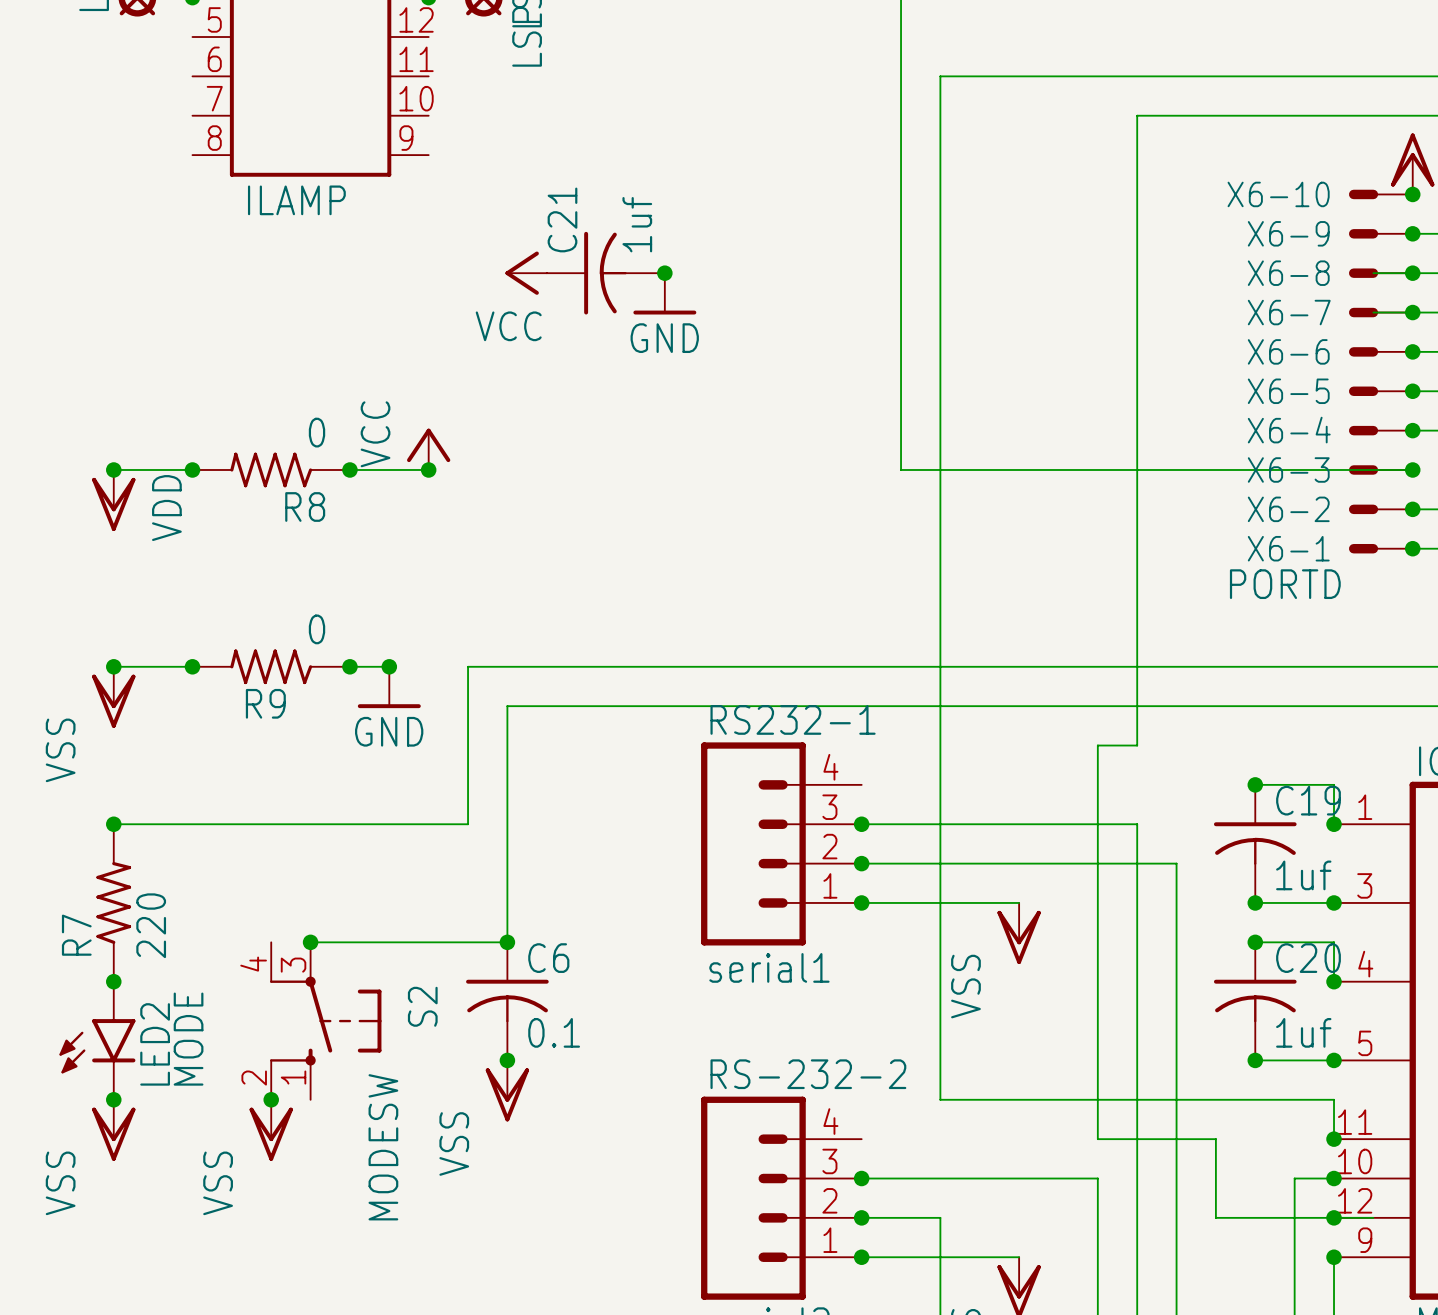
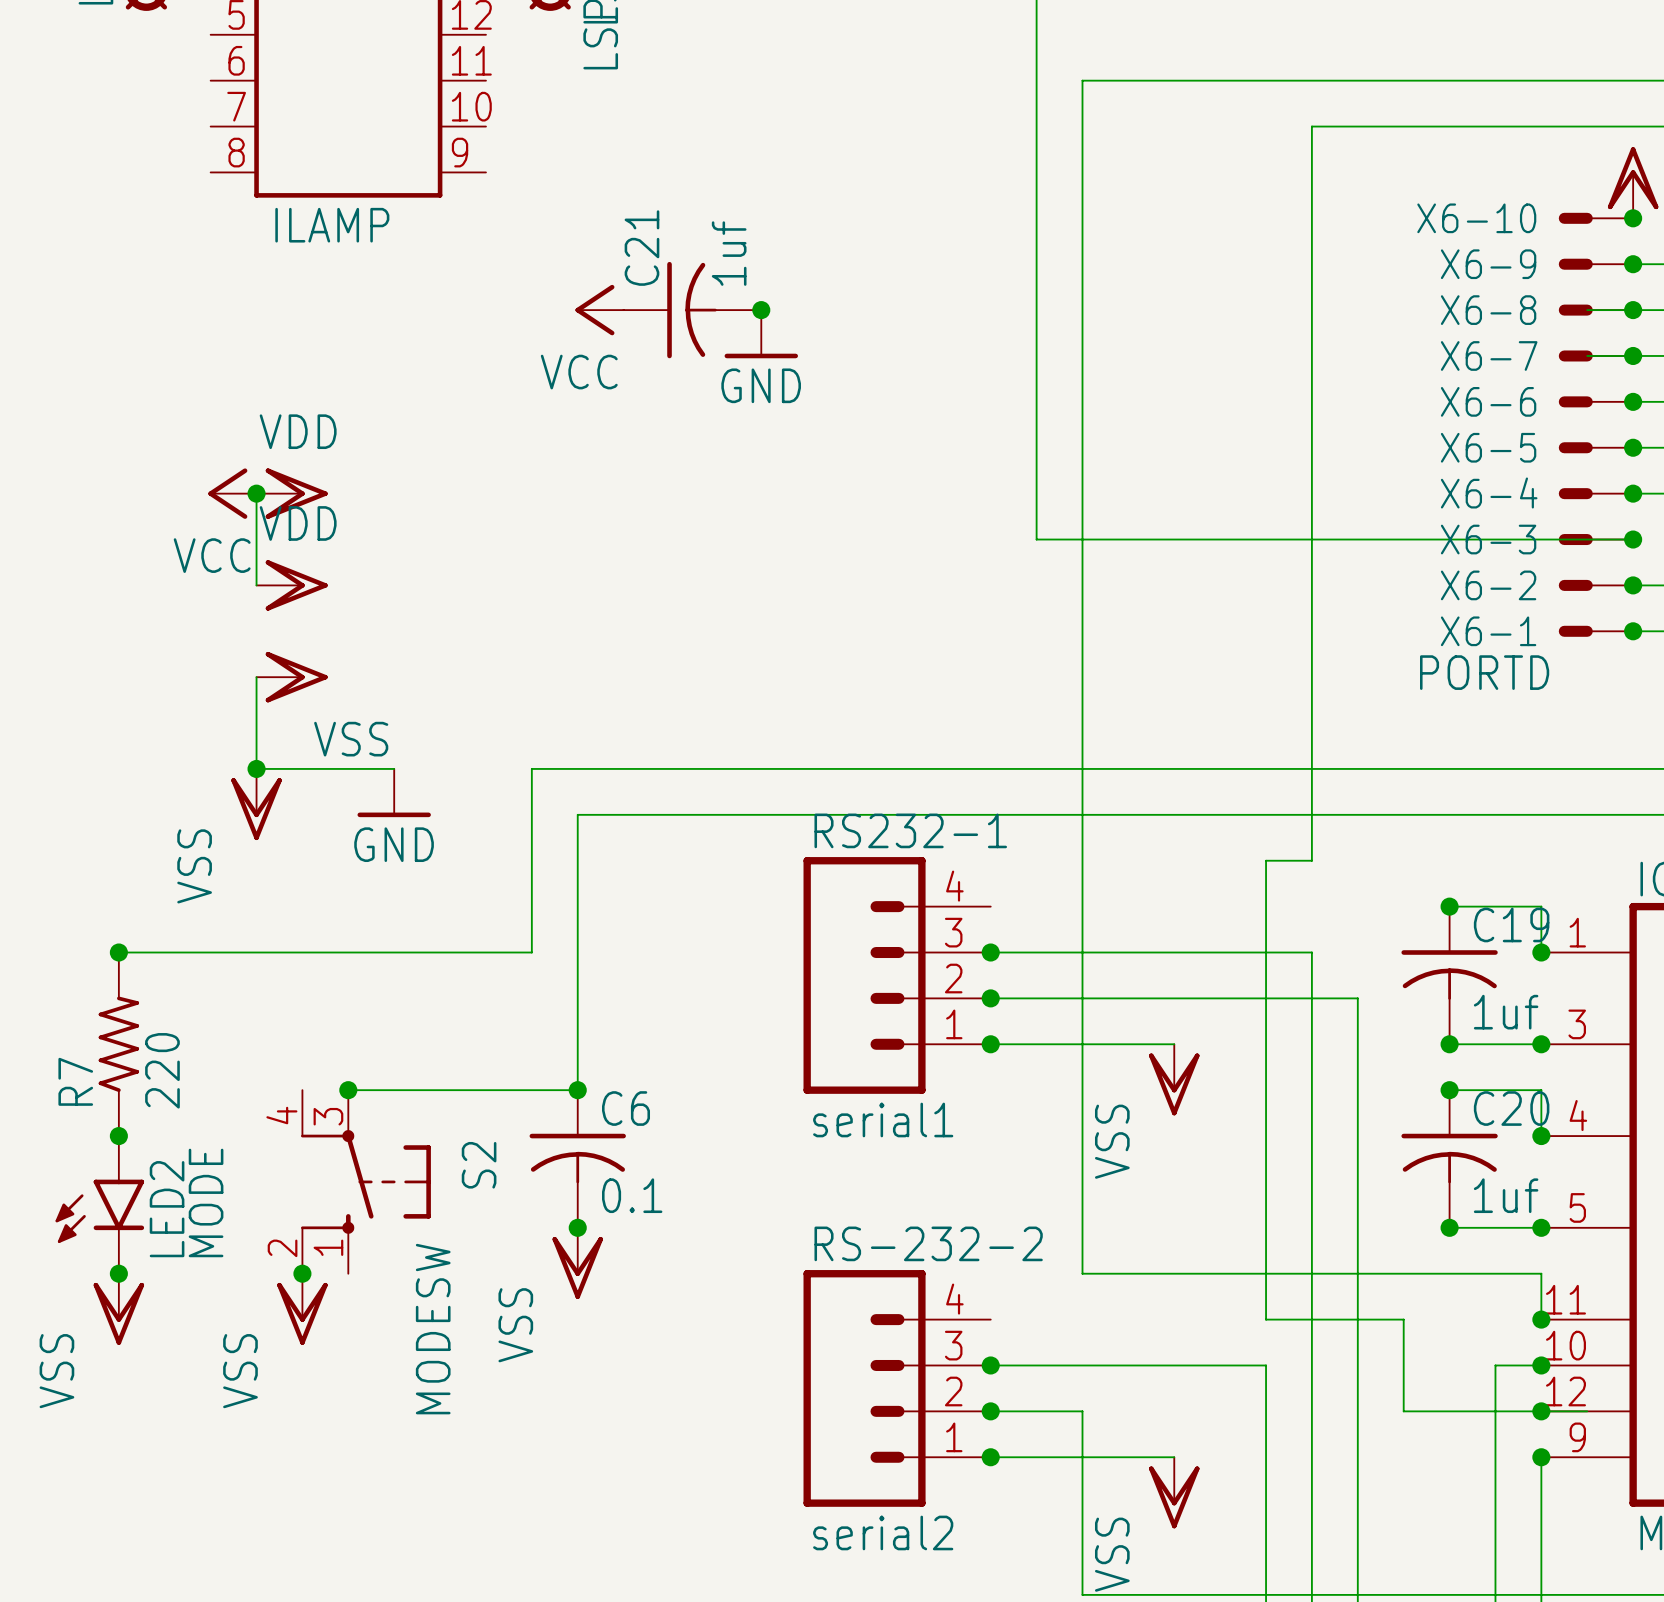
wire: none -> (256, 493) (256, 585)
power symbol: none -> VDD (292, 493)
power symbol rotation: 0° (428, 445) -> 90° counterclockwise (227, 493)
power symbol position: VCC (428, 449) -> VCC (232, 493)
wire: (113, 469) (192, 469) -> none
junction: (113, 469) -> none
junction position: (192, 469) -> (256, 493)
R8: 0 (271, 469) -> none
wire: (349, 469) (428, 469) -> none
junction: (349, 469) -> none
junction: (428, 469) -> none
power symbol: VDD (113, 500) -> none
power symbol: none -> VDD (292, 585)
power symbol: none -> VSS (292, 677)
wire: (113, 666) (192, 666) -> none
junction: (113, 666) -> none
junction position: (192, 666) -> (256, 768)
R9: 0 (271, 666) -> none
wire: (349, 666) (389, 666) -> (394, 768) (256, 768) (256, 677)
junction: (349, 666) -> none
junction: (389, 666) -> none
power symbol position: GND (389, 687) -> GND (394, 793)
power symbol: VSS (113, 697) -> none
power symbol: none -> VSS (256, 804)

